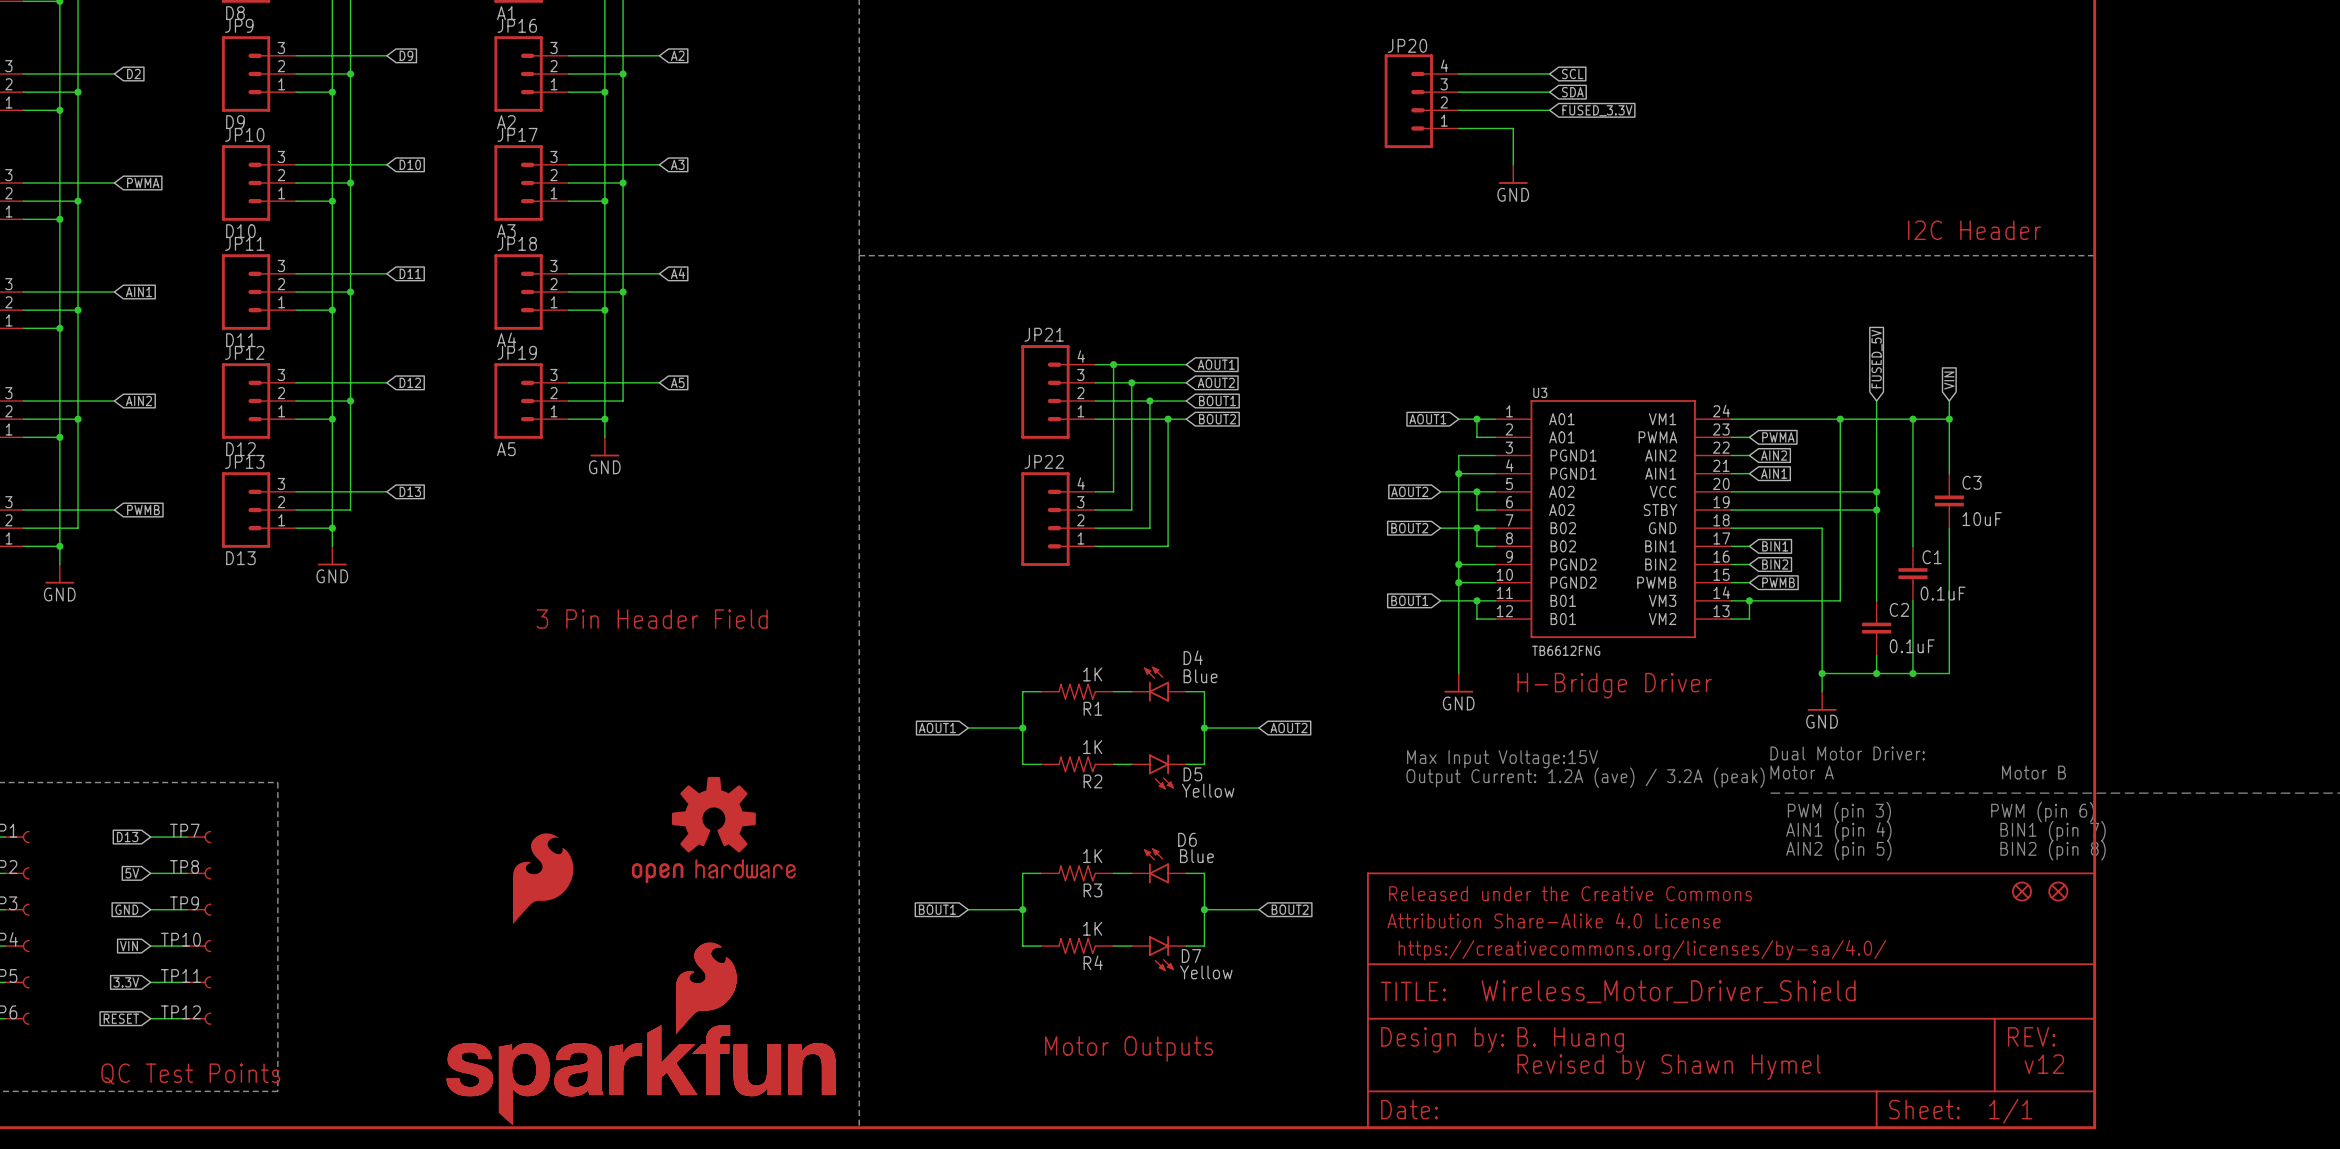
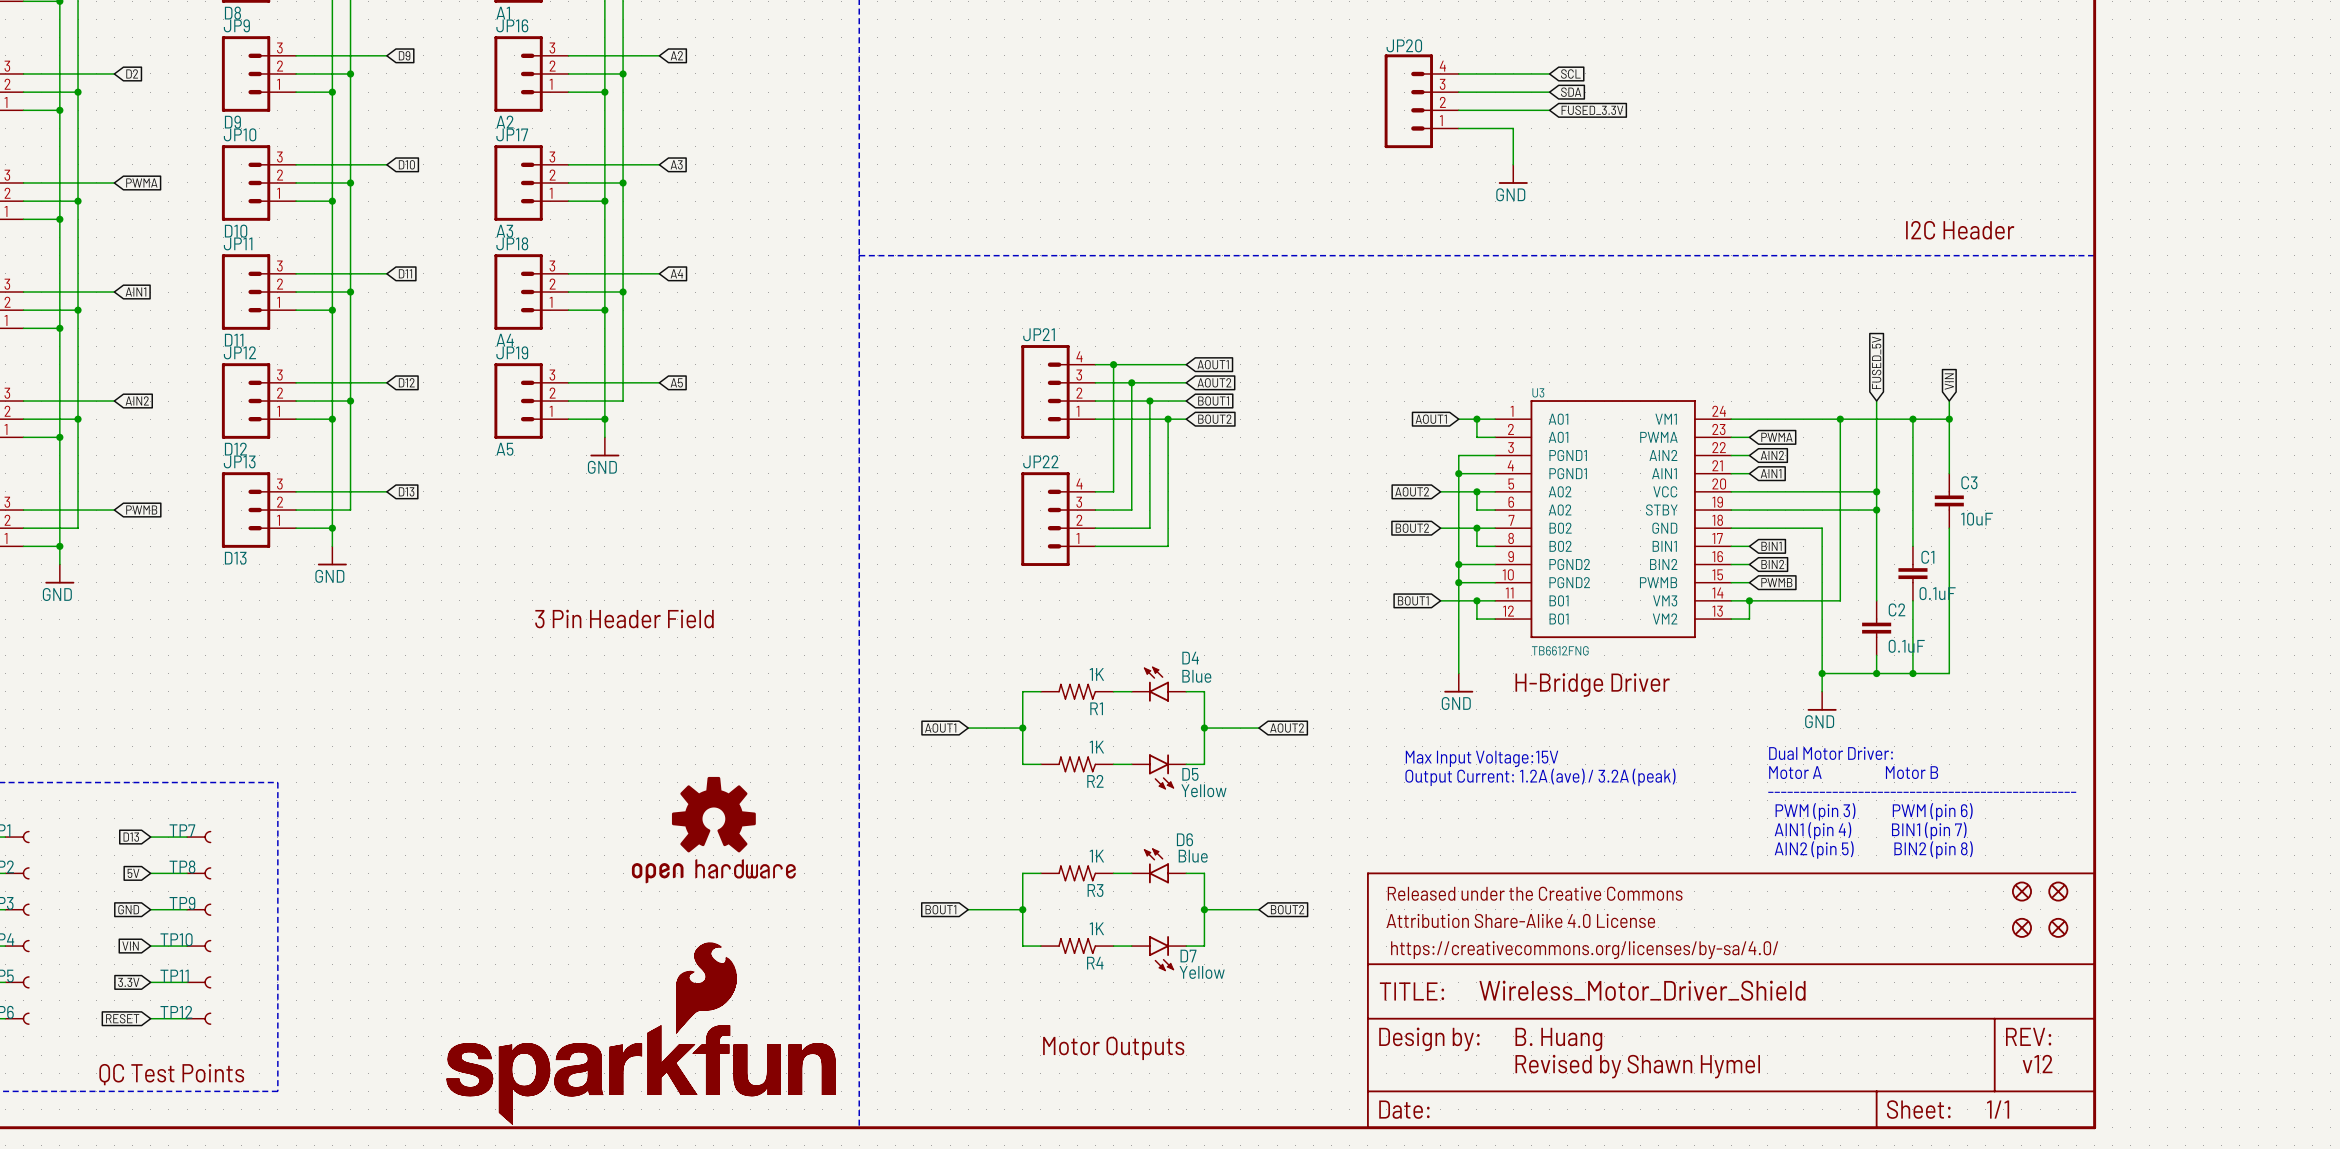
part: (543, 878) -> none
part: none -> (2021, 927)
part: none -> (2058, 927)

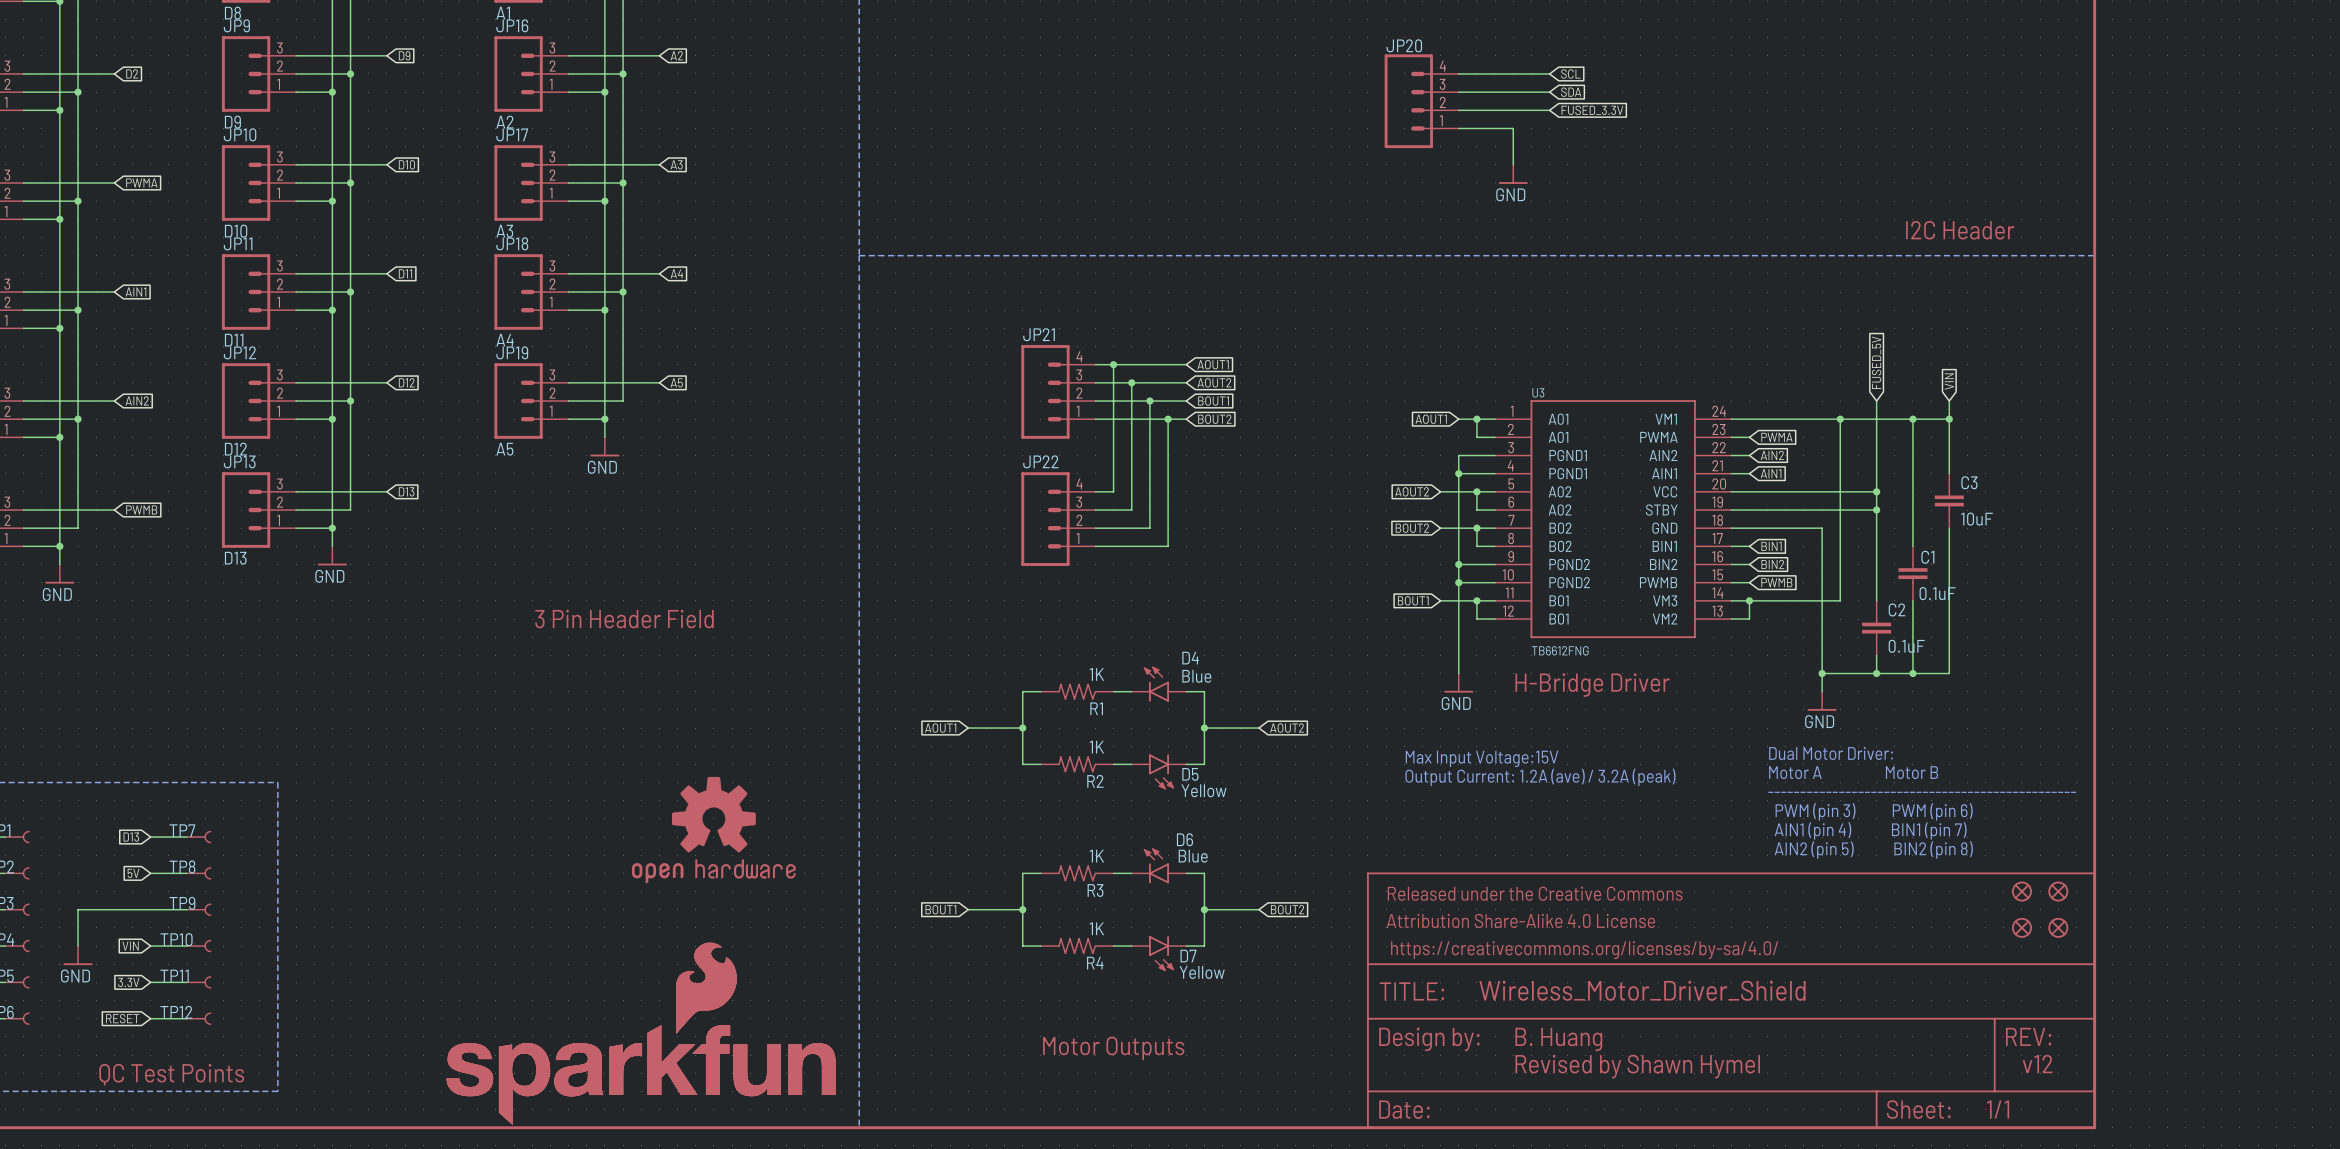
global label: GND (128, 909) -> none
wire: none -> (150, 909) (78, 909) (78, 946)
power symbol: none -> GND (78, 955)

